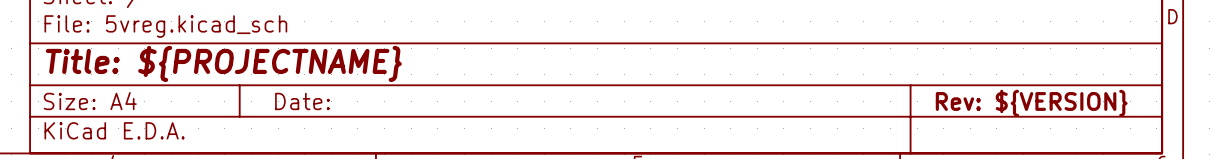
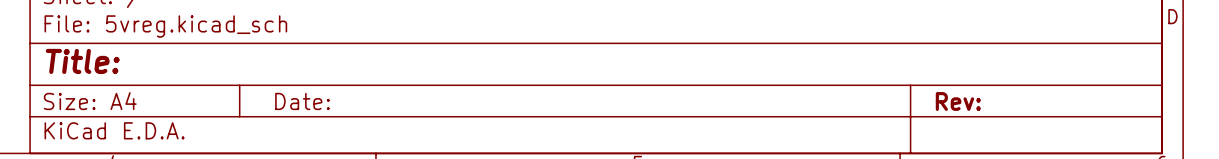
title block: Title: ${PROJECTNAME} (223, 63) -> Title: (82, 61)
title block: Rev: ${VERSION} (1031, 103) -> Rev: (958, 101)

